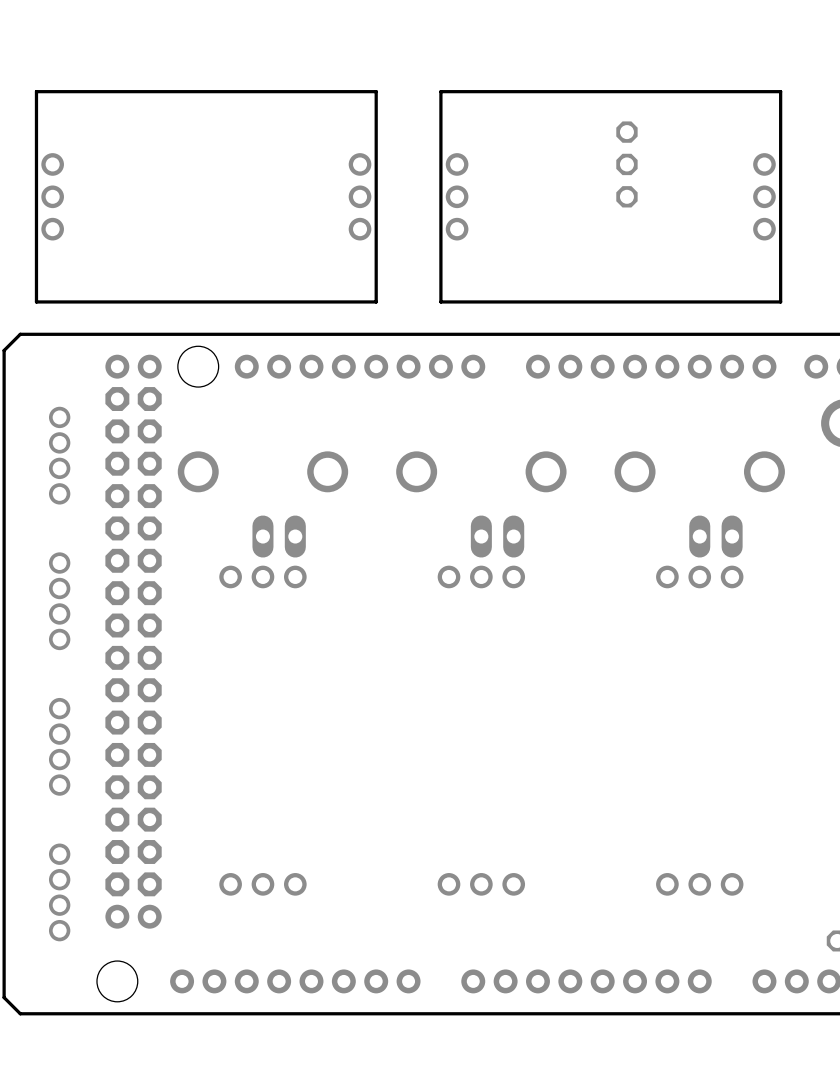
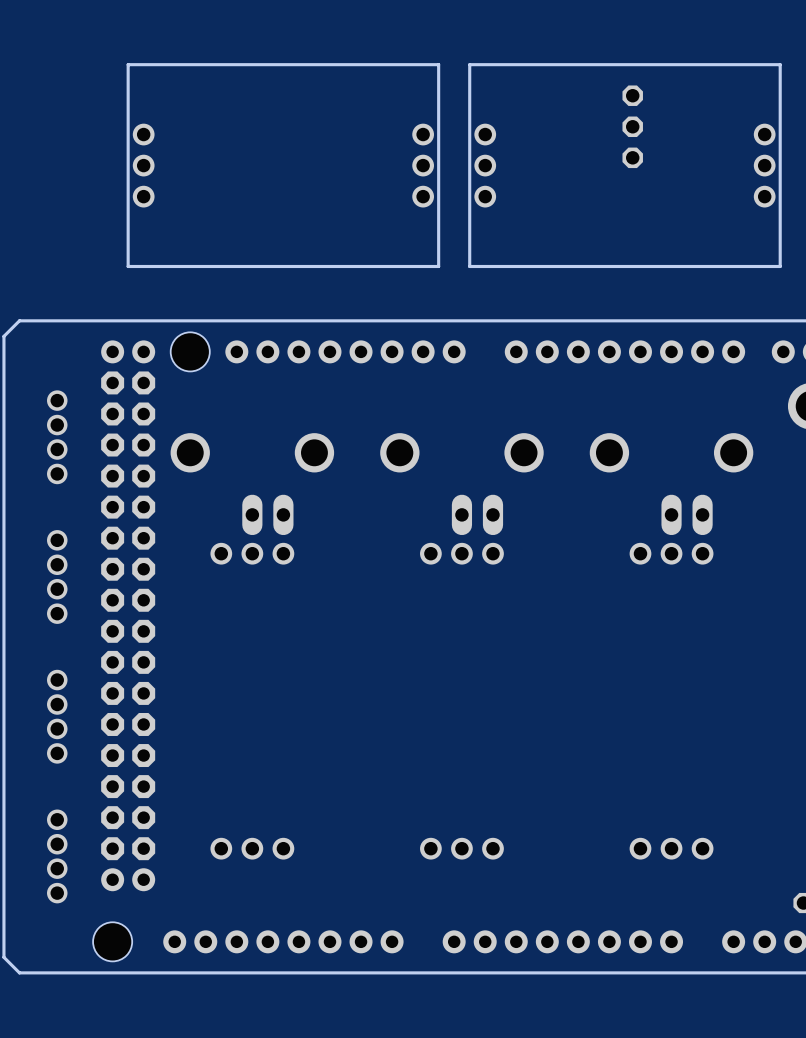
board edge: none -> (438, 64) (128, 64) (128, 266) (438, 266) (438, 64)
board edge: (376, 91) (36, 91) (36, 301) (376, 301) (376, 91) -> none
board edge: (780, 91) (440, 91) (440, 301) (780, 301) (780, 91) -> (780, 64) (780, 266) (469, 266) (469, 64) (780, 64)
part position: (626, 164) -> (632, 126)
part: none -> (423, 165)
part: none -> (485, 165)
part: none -> (764, 165)
part position: (52, 196) -> (143, 165)
part: (360, 196) -> none
part: (457, 196) -> none
part: (764, 196) -> none

